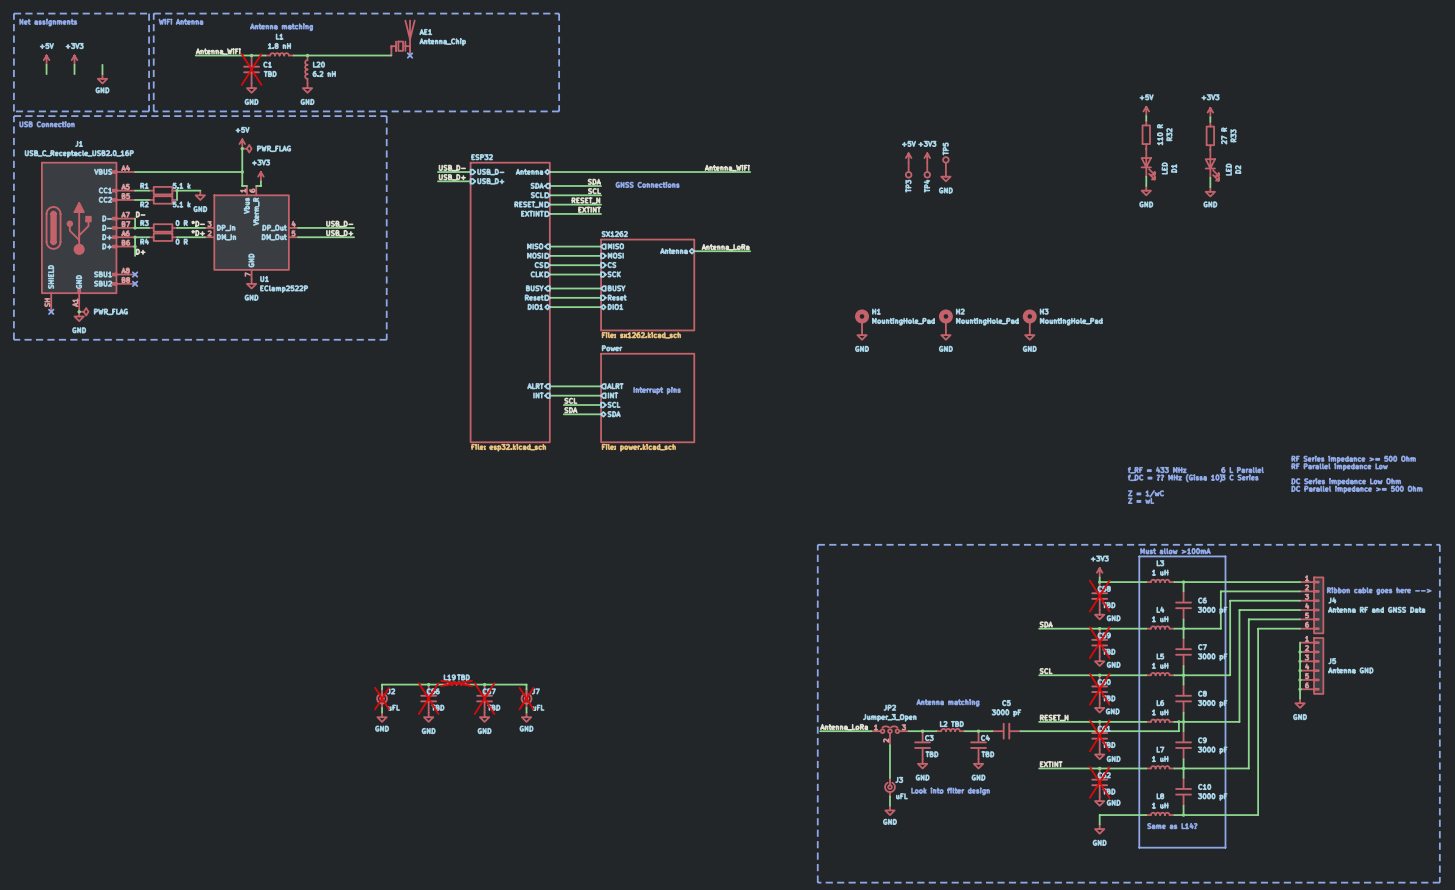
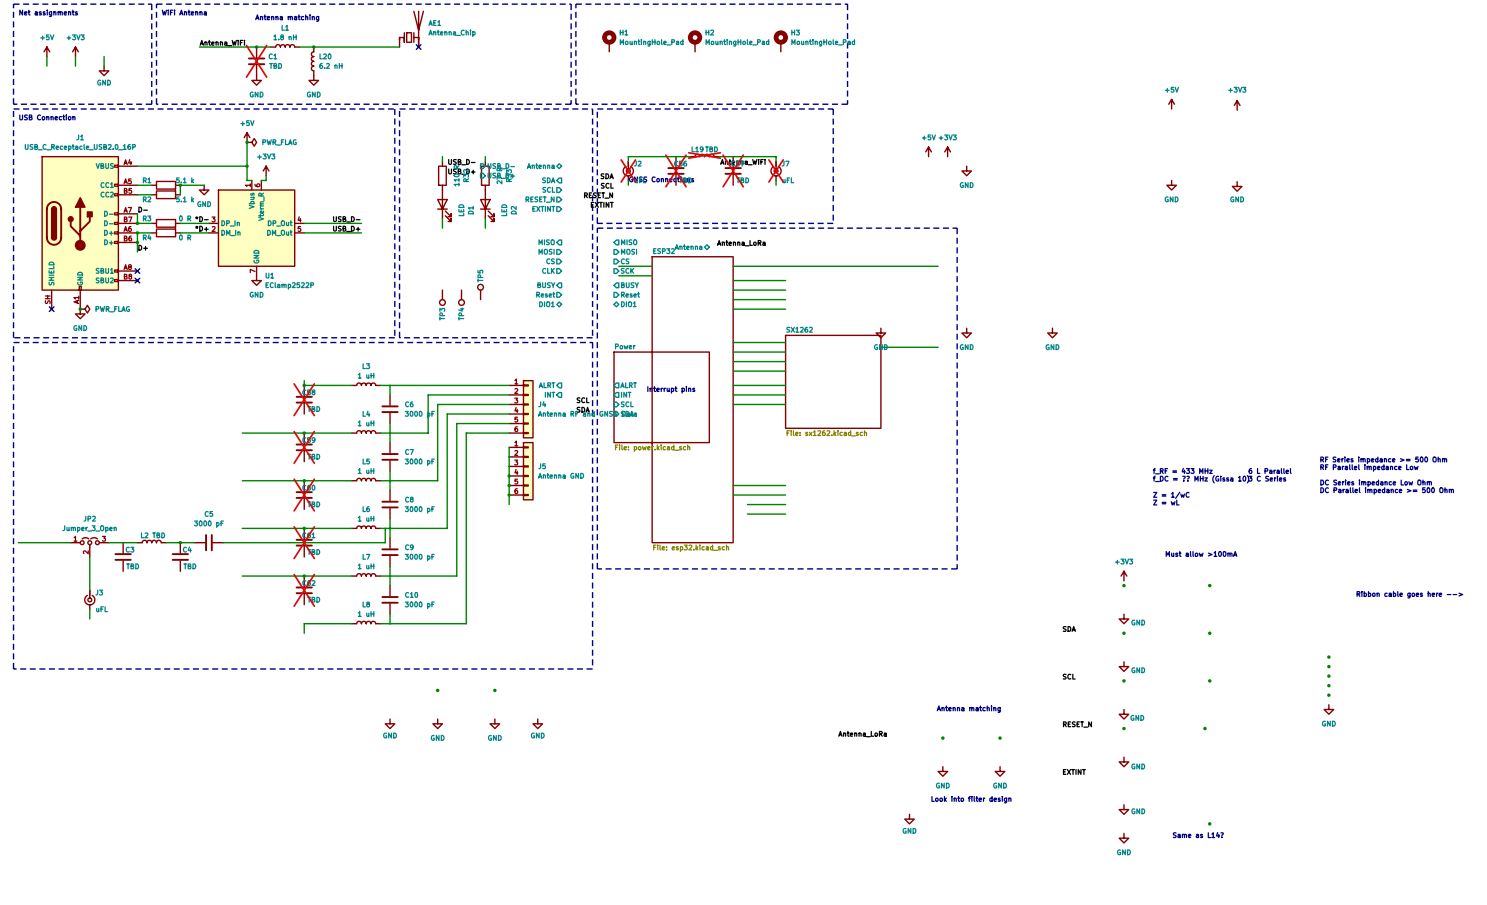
line: none -> (575, 4) (847, 4) (847, 104) (575, 104) (575, 4)
line: none -> (399, 109) (592, 109) (592, 337) (399, 337) (399, 109)
line: none -> (597, 109) (833, 109) (833, 223) (597, 223) (597, 109)
wire: (1146, 116) (1146, 120) -> none
wire: (1210, 117) (1210, 121) -> none
part position: (1146, 134) -> (442, 175)
part position: (1210, 135) -> (485, 175)
wire: none -> (442, 156) (442, 161)
wire: none -> (485, 156) (485, 161)
wire: none -> (690, 156) (628, 156) (628, 161)
wire: none -> (718, 156) (776, 156) (776, 161)
part position: (945, 164) -> (480, 292)
part position: (1147, 164) -> (444, 205)
part position: (1211, 165) -> (487, 205)
part position: (908, 170) -> (442, 297)
part position: (927, 170) -> (461, 297)
wire: (437, 172) (470, 172) -> none
wire: (549, 172) (750, 172) -> none
wire: (1146, 176) (1146, 185) -> none
wire: (1210, 177) (1210, 187) -> none
wire: (437, 181) (470, 181) -> none
wire: (549, 185) (601, 185) -> none
wire: none -> (628, 180) (628, 185)
wire: none -> (776, 180) (776, 185)
wire: (549, 195) (601, 195) -> none
wire: (549, 204) (601, 204) -> none
wire: (549, 213) (601, 213) -> none
wire: none -> (442, 218) (442, 228)
wire: none -> (485, 218) (485, 228)
line: none -> (597, 228) (597, 568) (957, 568) (957, 228) (597, 228)
wire: (549, 246) (601, 246) -> none
wire: (694, 251) (750, 251) -> none
wire: (549, 255) (601, 255) -> none
wire: (549, 265) (601, 265) -> none
wire: none -> (618, 266) (652, 266)
wire: none -> (733, 266) (938, 266)
wire: (549, 274) (601, 274) -> none
wire: none -> (618, 275) (652, 275)
wire: none -> (733, 280) (785, 280)
sheet position: (647, 285) -> (833, 381)
wire: (549, 288) (601, 288) -> none
wire: none -> (733, 290) (785, 290)
wire: (549, 297) (601, 297) -> none
sheet position: (510, 302) -> (692, 399)
wire: none -> (733, 299) (785, 299)
wire: (549, 307) (601, 307) -> none
wire: none -> (733, 309) (785, 309)
part position: (862, 319) -> (609, 41)
part position: (945, 319) -> (695, 41)
part position: (1029, 319) -> (780, 41)
line: none -> (13, 342) (13, 668) (592, 668) (592, 342) (13, 342)
wire: none -> (733, 342) (785, 342)
wire: none -> (880, 347) (938, 347)
wire: none -> (733, 352) (785, 352)
wire: none -> (733, 361) (785, 361)
wire: none -> (733, 371) (785, 371)
wire: none -> (304, 380) (304, 385) (351, 385)
junction: none -> (304, 385)
wire: none -> (380, 385) (509, 385)
wire: none -> (390, 385) (390, 394)
wire: (549, 386) (601, 386) -> none
wire: none -> (733, 385) (785, 385)
wire: none -> (509, 394) (428, 394) (428, 433) (380, 433)
wire: (549, 395) (601, 395) -> none
wire: none -> (733, 394) (785, 394)
wire: none -> (509, 404) (437, 404) (437, 480) (380, 480)
wire: (563, 405) (601, 405) -> none
wire: none -> (733, 404) (785, 404)
wire: none -> (509, 414) (447, 414) (447, 528) (380, 528)
wire: none -> (390, 423) (390, 442)
wire: none -> (509, 423) (456, 423) (456, 576) (380, 576)
wire: none -> (242, 433) (351, 433)
junction: none -> (304, 433)
wire: none -> (509, 433) (466, 433) (466, 623) (380, 623)
wire: none -> (509, 447) (509, 504)
wire: none -> (390, 471) (390, 490)
junction: none -> (509, 475)
wire: none -> (242, 480) (351, 480)
junction: none -> (304, 480)
junction: none -> (509, 485)
wire: none -> (733, 485) (785, 485)
junction: none -> (509, 495)
wire: none -> (733, 495) (785, 495)
wire: none -> (747, 504) (785, 504)
wire: none -> (747, 514) (785, 514)
wire: none -> (390, 518) (390, 537)
wire: none -> (242, 528) (351, 528)
junction: none -> (304, 528)
wire: none -> (385, 528) (385, 542) (223, 542)
wire: none -> (18, 542) (70, 542)
wire: none -> (108, 542) (137, 542)
wire: none -> (166, 542) (194, 542)
junction: none -> (180, 542)
line: (817, 544) (1439, 544) (1439, 882) (817, 882) (817, 544) -> none
wire: none -> (89, 556) (89, 590)
line: (1139, 556) (1225, 556) (1225, 847) (1139, 847) (1139, 556) -> none
wire: none -> (390, 566) (390, 585)
wire: none -> (242, 576) (351, 576)
junction: none -> (304, 576)
wire: (1099, 577) (1099, 582) (1146, 582) -> none
part position: (1160, 580) -> (366, 384)
wire: (1174, 582) (1300, 582) -> none
wire: (1183, 582) (1183, 591) -> none
wire: (1300, 591) (1220, 591) (1220, 628) (1174, 628) -> none
part position: (1099, 596) -> (304, 399)
wire: (1300, 600) (1230, 600) (1230, 675) (1174, 675) -> none
wire: none -> (89, 609) (89, 618)
part position: (1183, 605) -> (390, 409)
part position: (1311, 605) -> (521, 409)
wire: none -> (390, 614) (390, 623)
wire: (1300, 610) (1239, 610) (1239, 721) (1174, 721) -> none
wire: none -> (351, 623) (304, 623) (304, 633)
wire: (1183, 619) (1183, 637) -> none
wire: (1300, 619) (1248, 619) (1248, 768) (1174, 768) -> none
part position: (1160, 627) -> (366, 431)
wire: (1039, 628) (1146, 628) -> none
wire: (1300, 628) (1258, 628) (1258, 815) (1174, 815) -> none
part position: (1099, 642) -> (304, 447)
wire: (1300, 642) (1300, 698) -> none
part position: (1183, 651) -> (390, 456)
wire: (1183, 665) (1183, 684) -> none
part position: (1311, 665) -> (521, 471)
part position: (1160, 674) -> (366, 479)
wire: (1039, 675) (1146, 675) -> none
part position: (456, 683) -> (704, 155)
wire: (442, 684) (382, 684) (382, 689) -> none
wire: (470, 684) (526, 684) (526, 689) -> none
part position: (1099, 689) -> (304, 495)
part position: (382, 698) -> (628, 170)
part position: (428, 698) -> (675, 170)
part position: (484, 698) -> (733, 170)
part position: (526, 698) -> (776, 170)
part position: (1183, 698) -> (390, 504)
wire: (382, 707) (382, 712) -> none
wire: (526, 707) (526, 712) -> none
wire: (1183, 712) (1183, 731) -> none
part position: (1160, 720) -> (366, 527)
wire: (1039, 721) (1146, 721) -> none
wire: (1178, 721) (1178, 731) (1020, 731) -> none
part position: (950, 730) -> (151, 541)
wire: (820, 731) (871, 731) -> none
wire: (908, 731) (936, 731) -> none
wire: (964, 731) (992, 731) -> none
part position: (1006, 731) -> (208, 542)
part position: (889, 735) -> (89, 547)
part position: (1099, 735) -> (304, 542)
wire: (889, 745) (889, 777) -> none
part position: (922, 745) -> (123, 556)
part position: (978, 745) -> (180, 556)
part position: (1183, 745) -> (390, 552)
wire: (1183, 759) (1183, 777) -> none
part position: (1160, 767) -> (366, 574)
wire: (1039, 768) (1146, 768) -> none
junction: (1099, 768) -> none
part position: (1099, 782) -> (304, 590)
part position: (889, 787) -> (89, 599)
part position: (1183, 791) -> (390, 599)
wire: (889, 796) (889, 805) -> none
wire: (1183, 805) (1183, 815) -> none
part position: (1160, 813) -> (366, 622)
wire: (1146, 815) (1099, 815) (1099, 824) -> none

